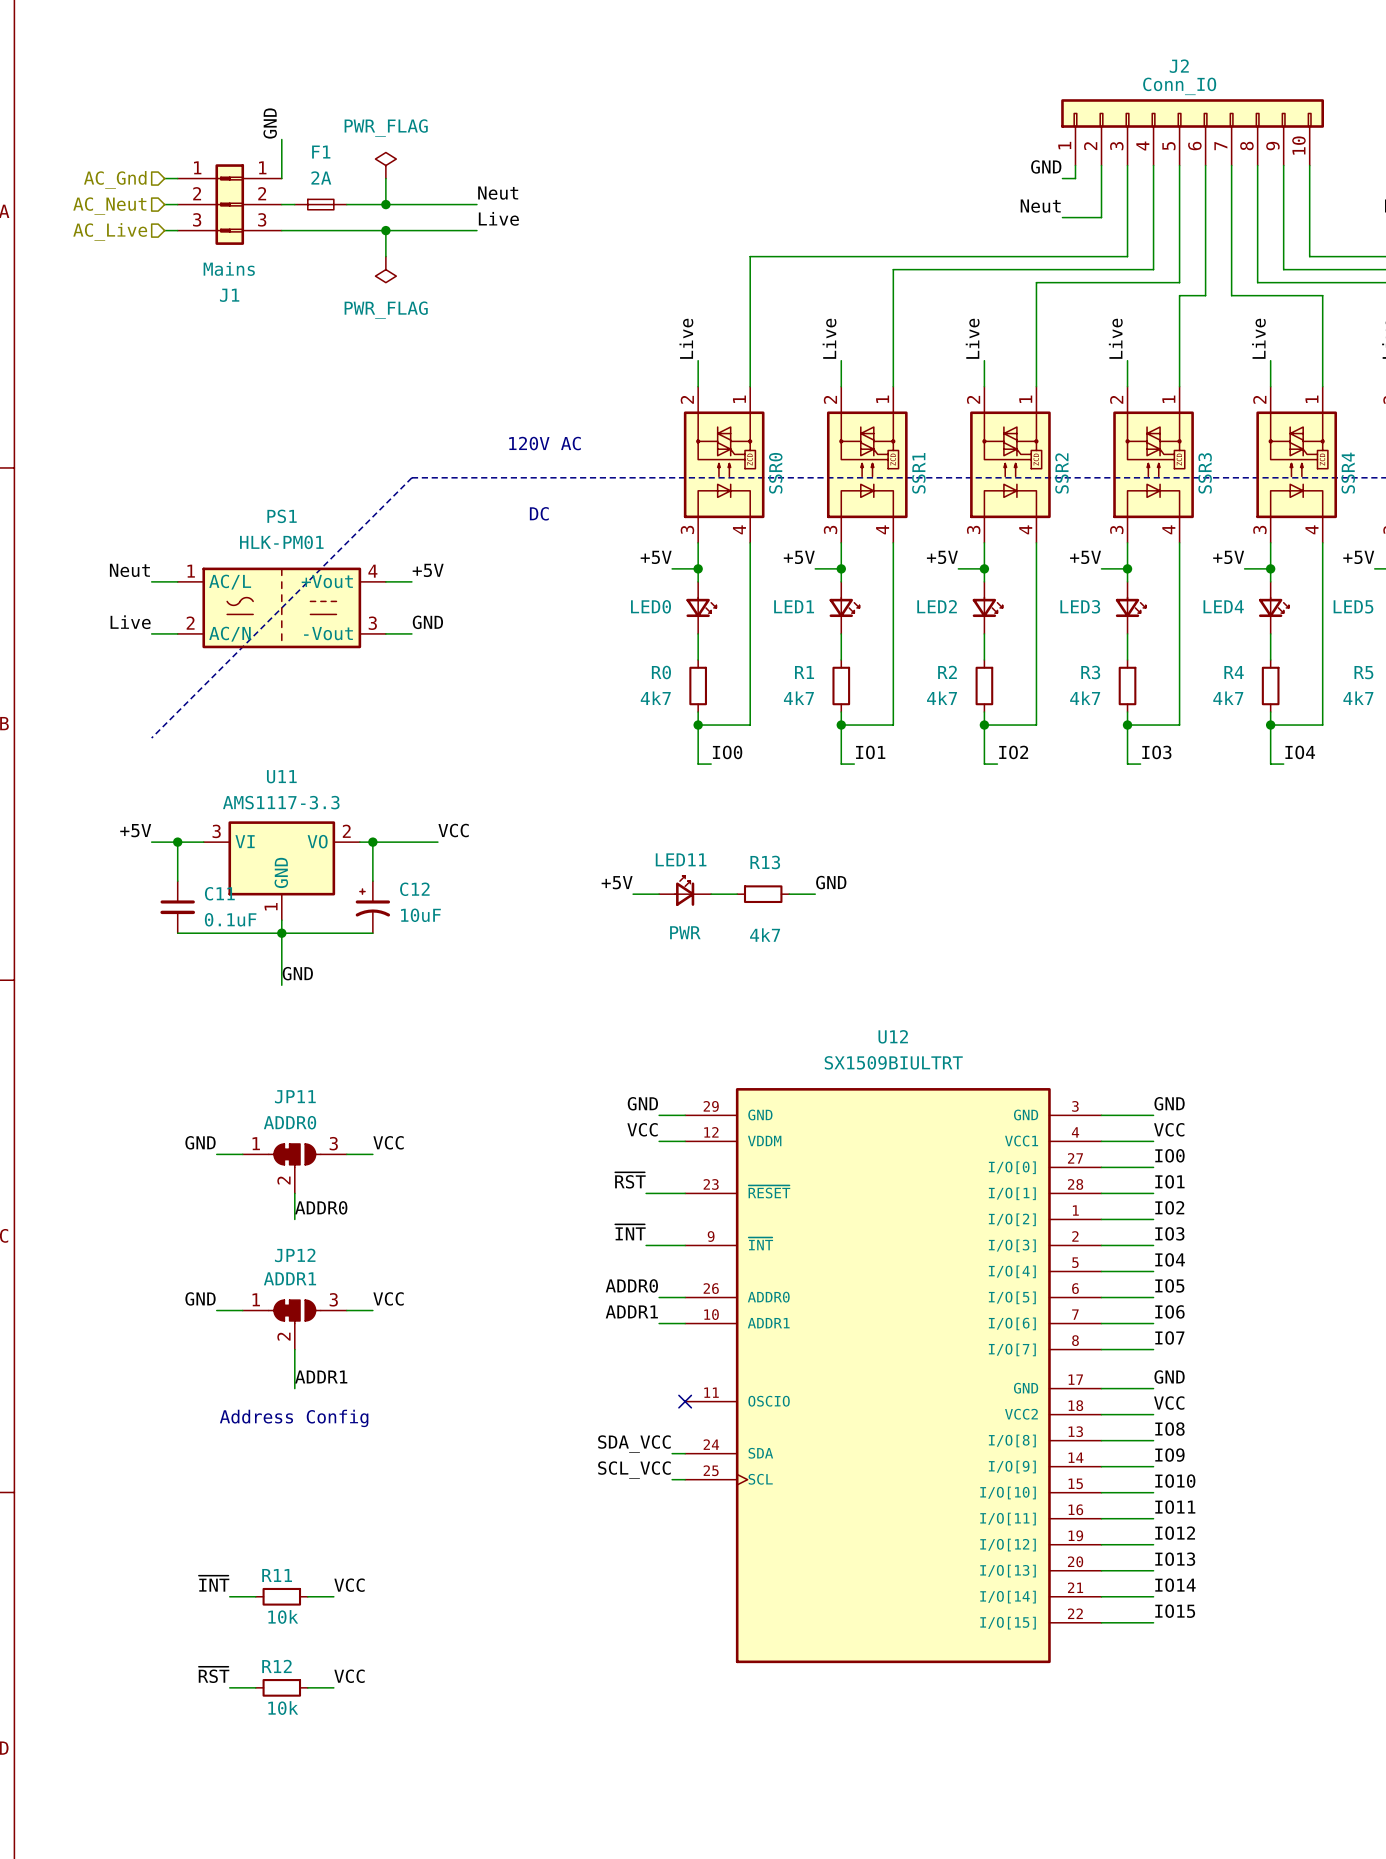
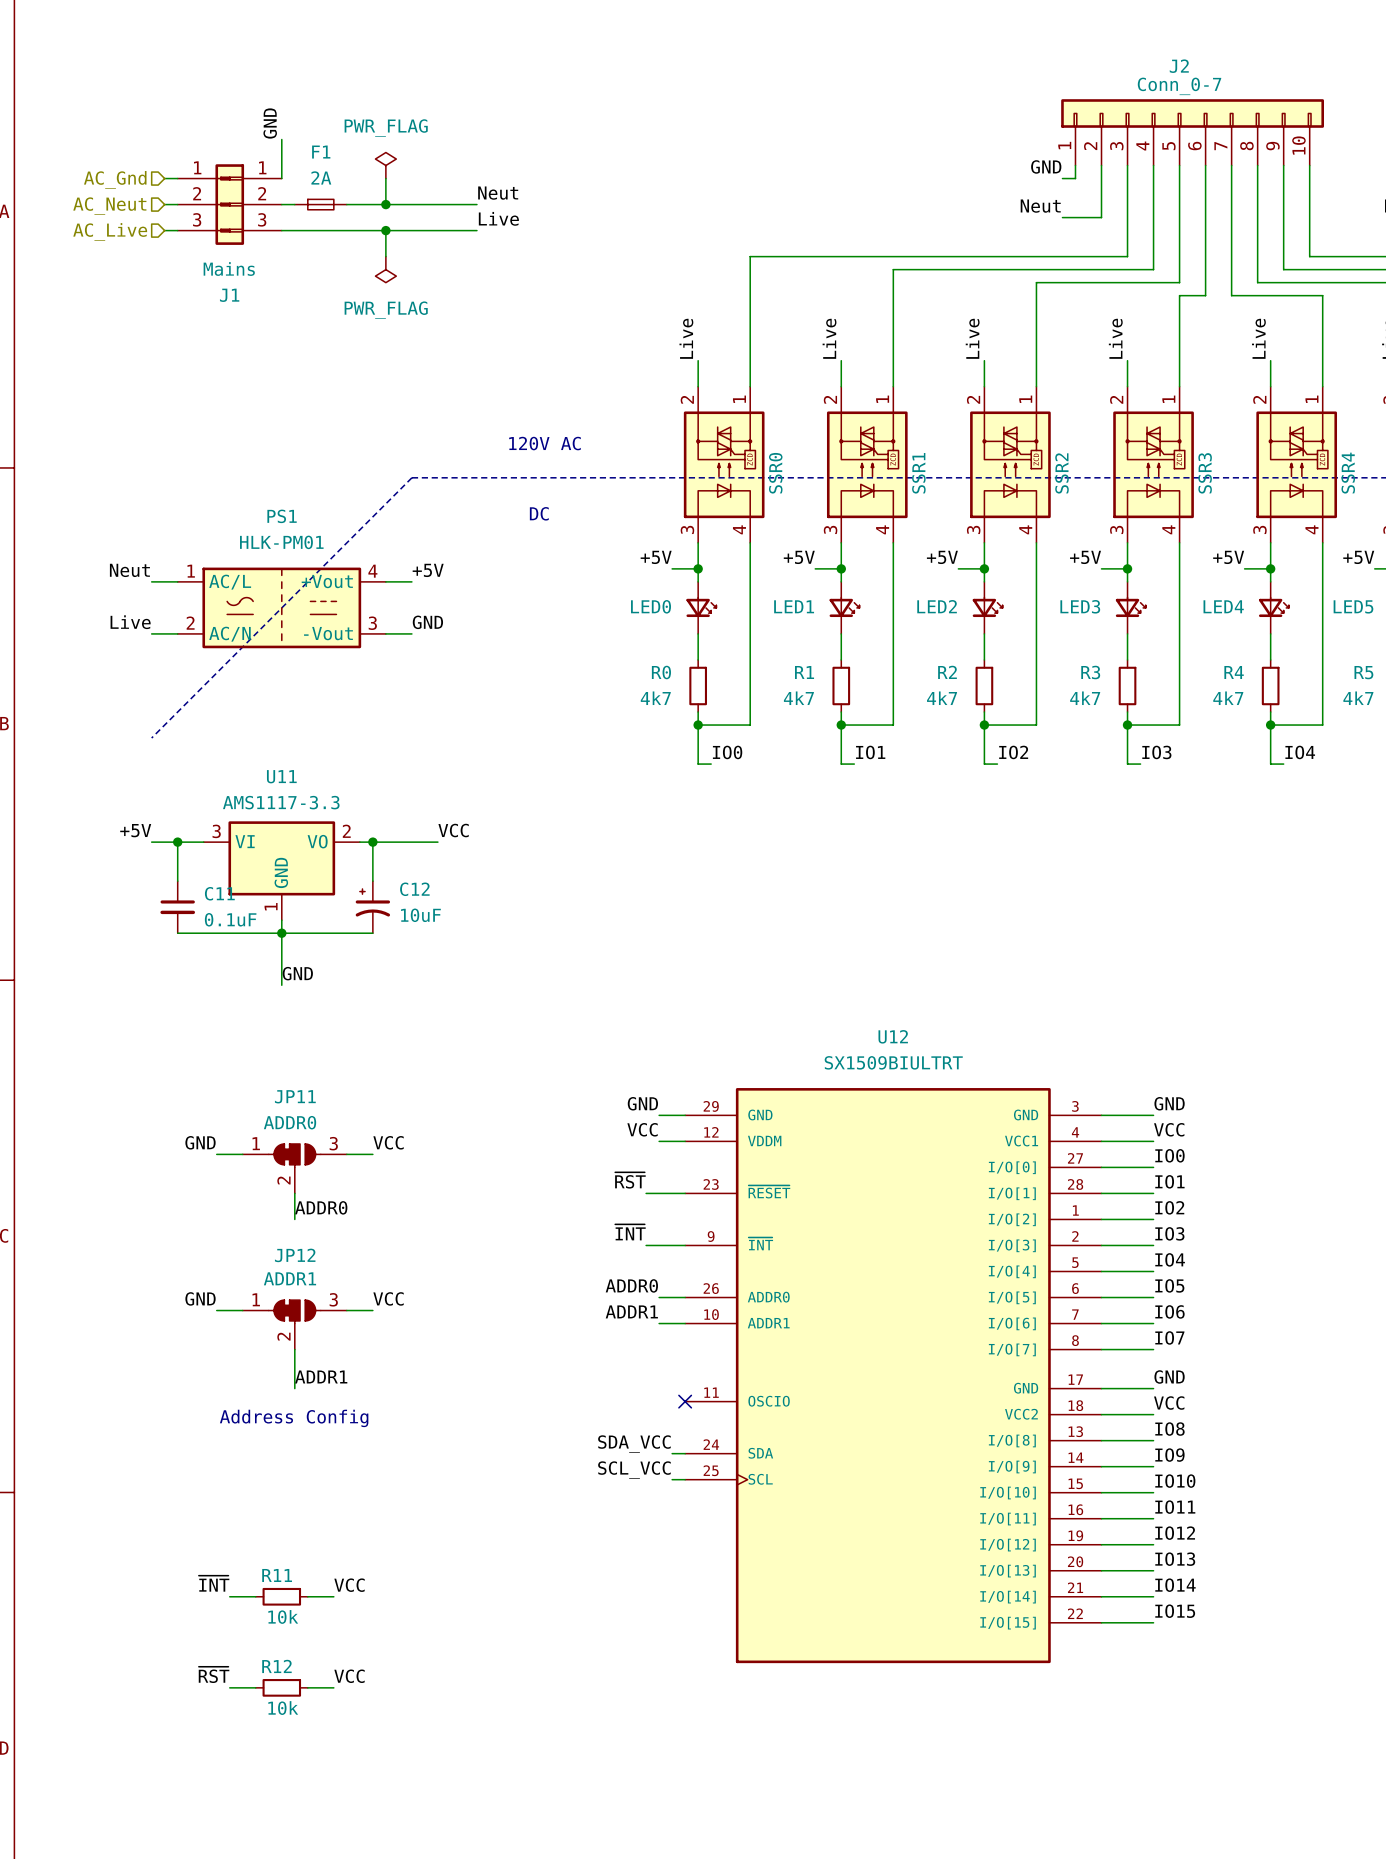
J2 value: Conn_IO (1179, 86) -> Conn_0-7 (1179, 86)
label: +5V (617, 882) -> none
label: GND (831, 882) -> none
LED11: PWR (685, 890) -> none
wire: (633, 894) (659, 894) -> none
wire: (711, 894) (737, 894) -> none
R13: 4k7 (763, 894) -> none
wire: (789, 894) (815, 894) -> none

